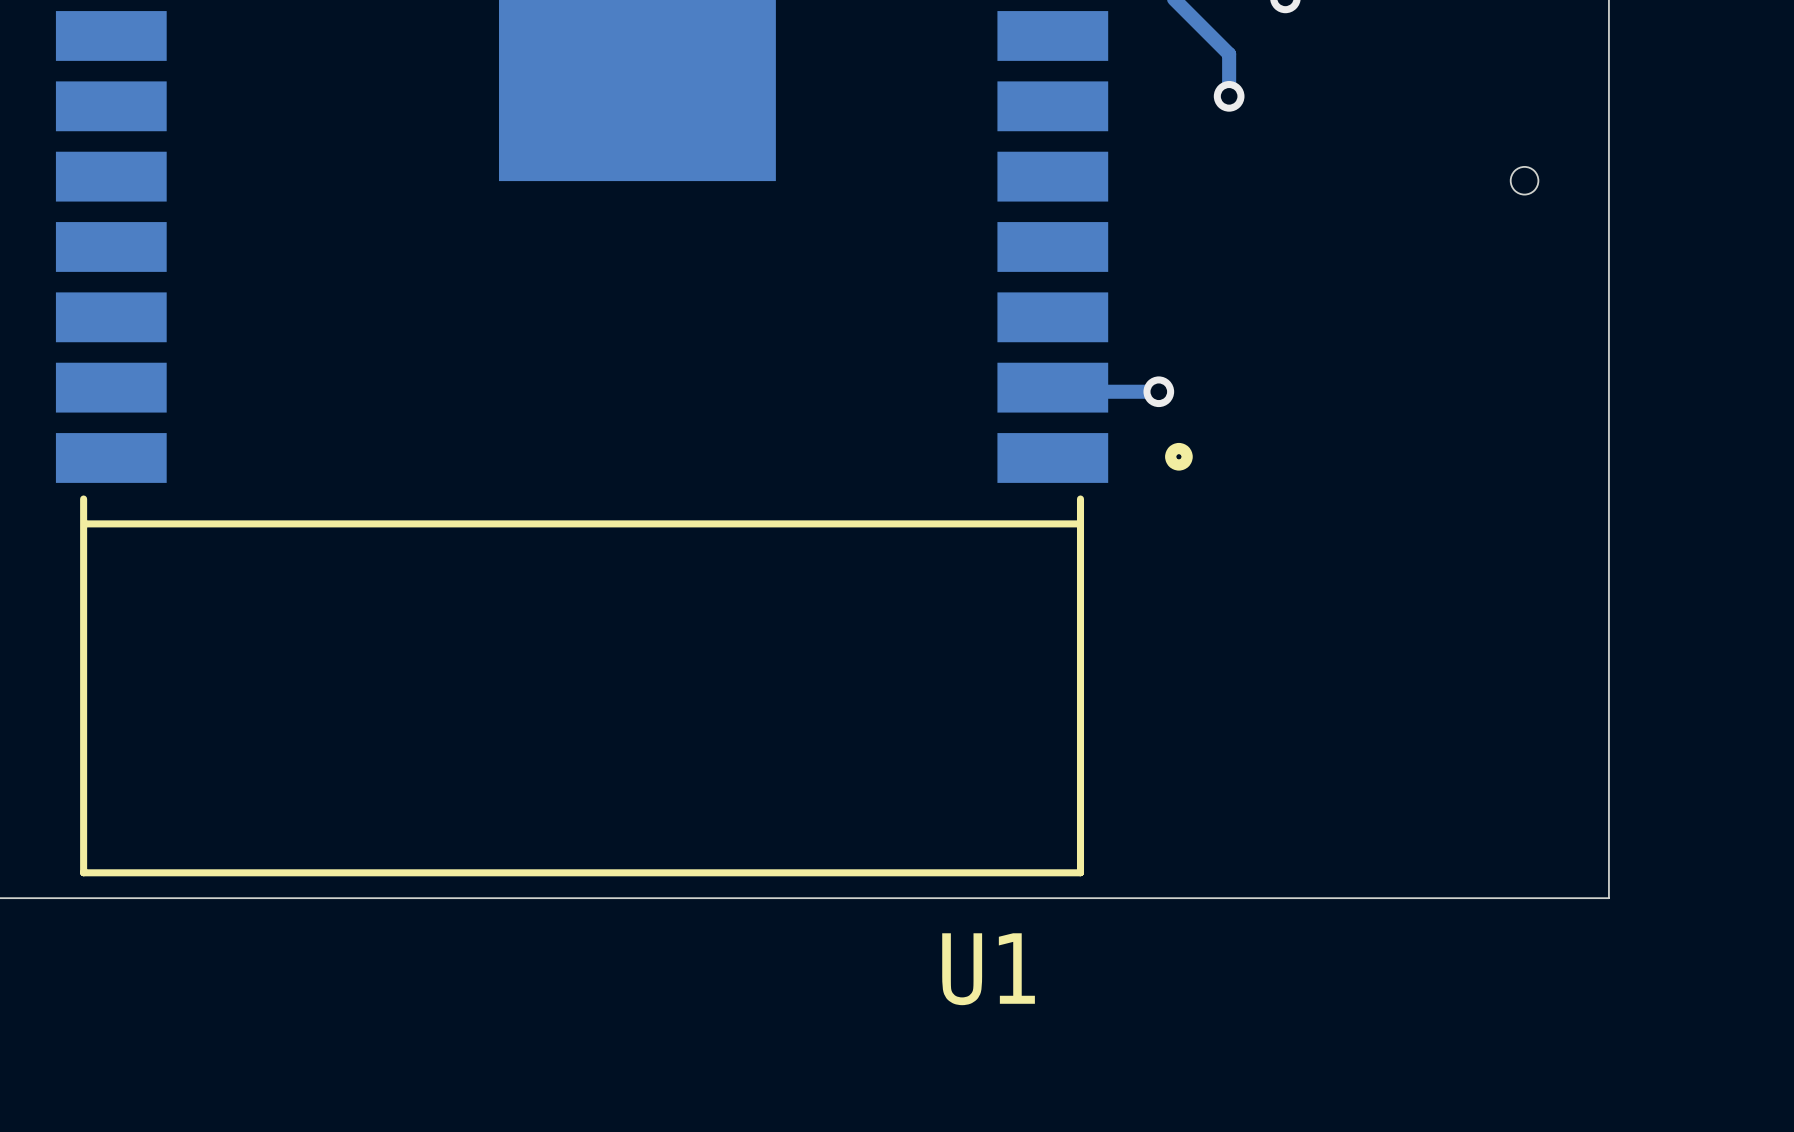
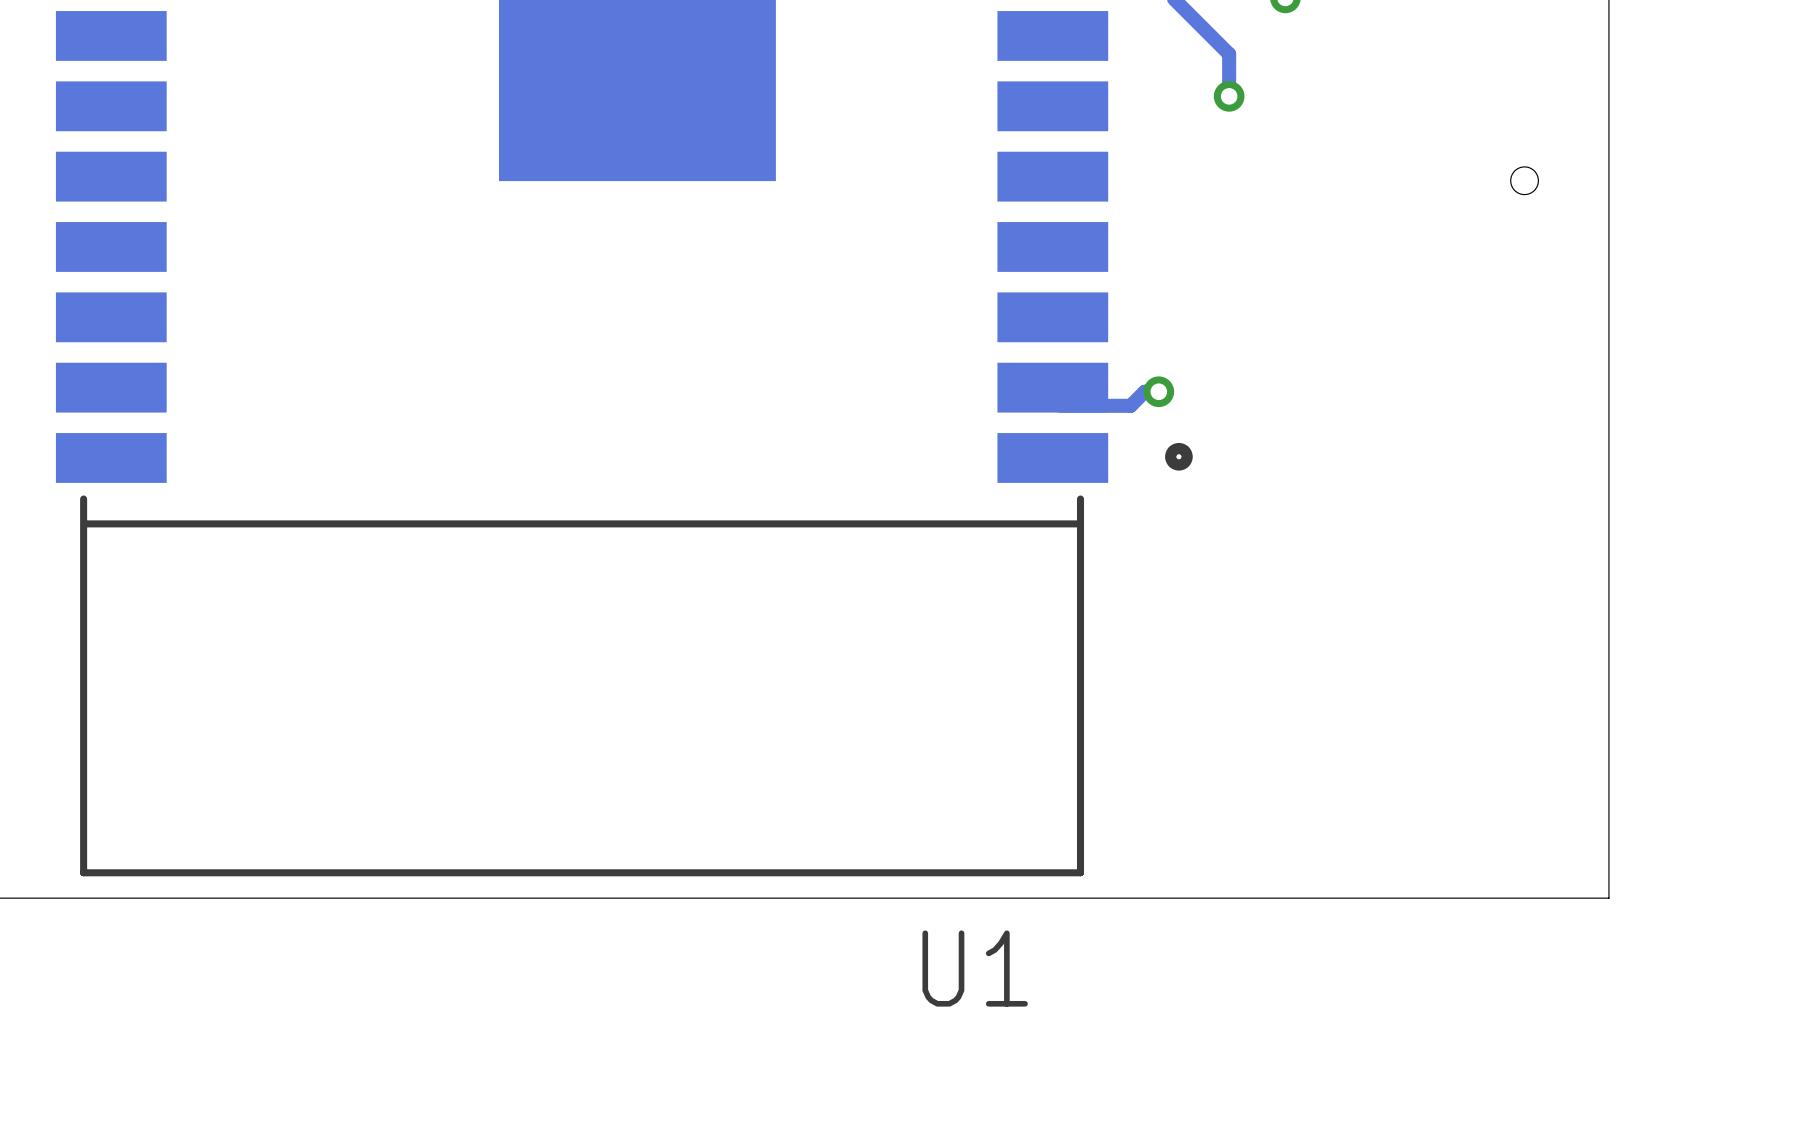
track: (1144, 391) (1088, 391) -> (1144, 391) (1130, 405) (1060, 405)

